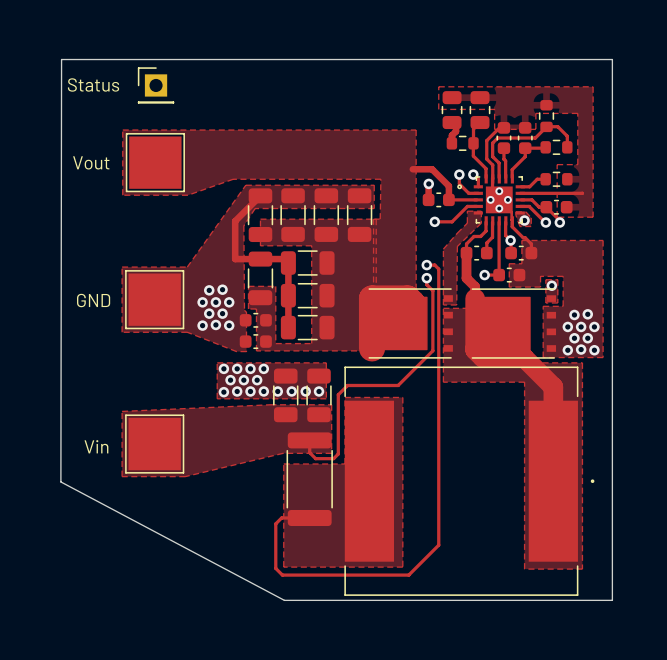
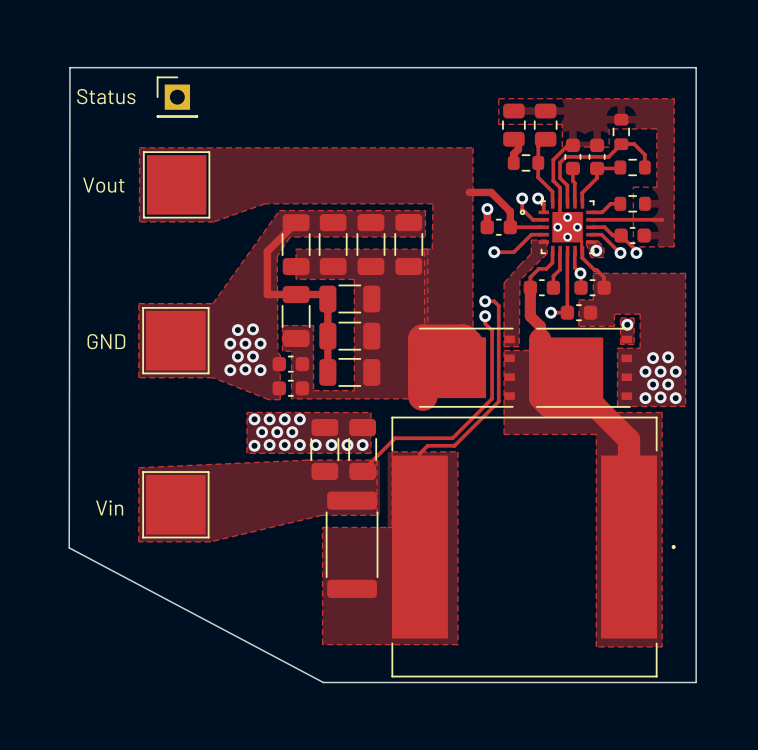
track: (438, 353) (438, 545) (408, 575) (282, 575) (275, 568) (275, 523) (281, 518) (309, 518) -> (498, 401) (454, 445) (427, 445) (419, 453) (419, 547)
track: (338, 394) (338, 454) (333, 458) (315, 458) (309, 452) (309, 440) -> (384, 448) (362, 470)

